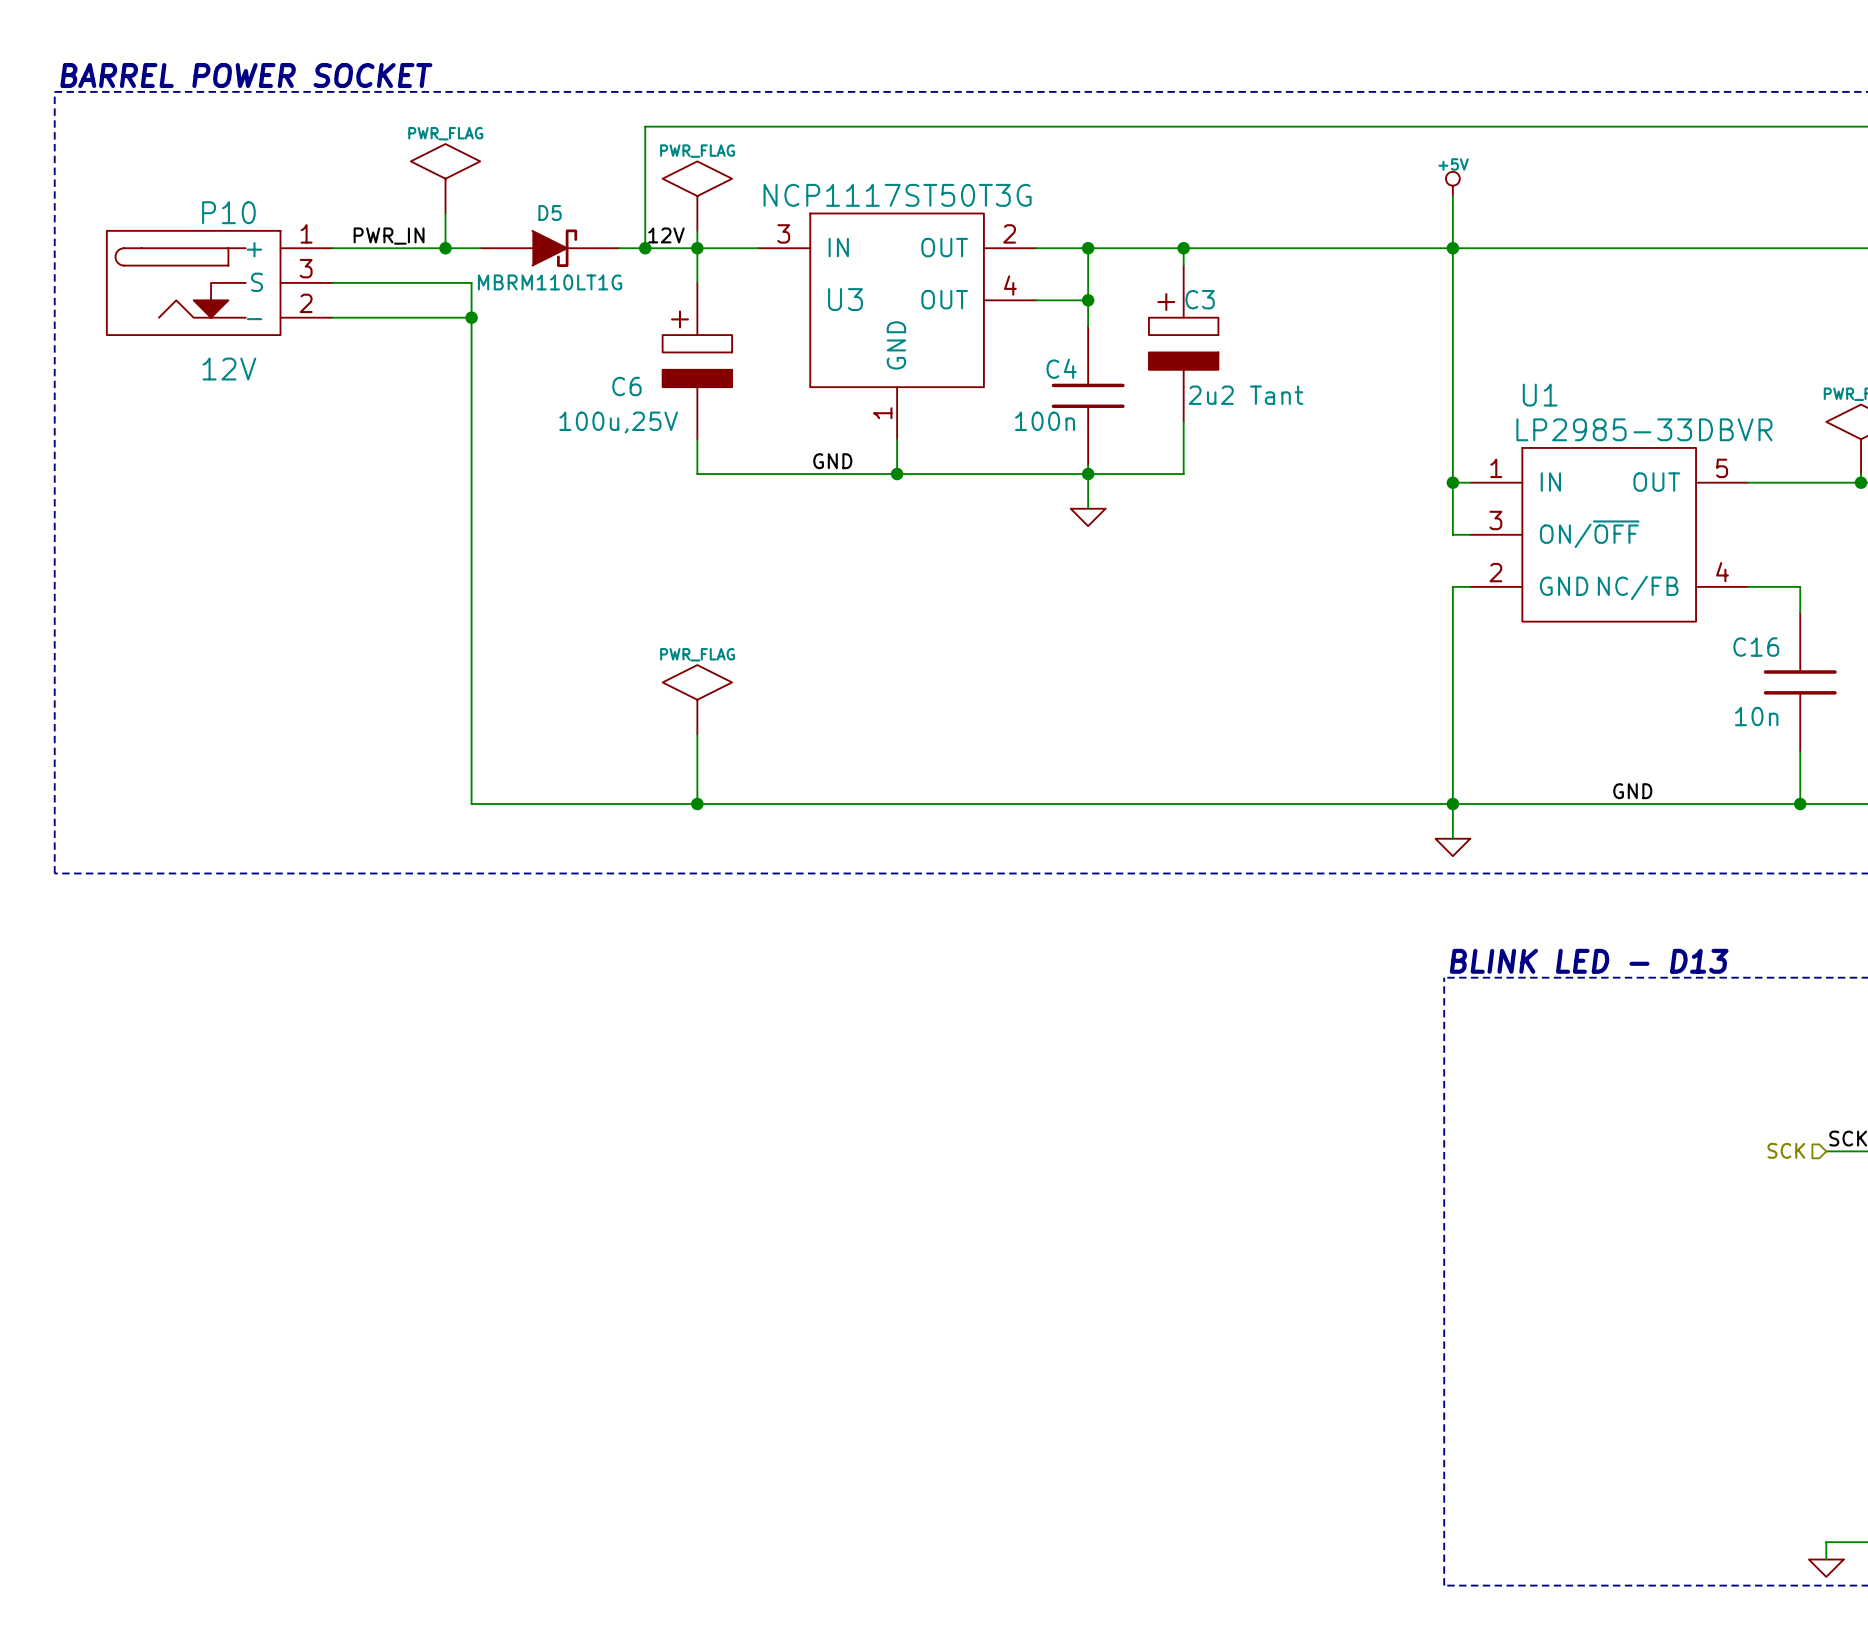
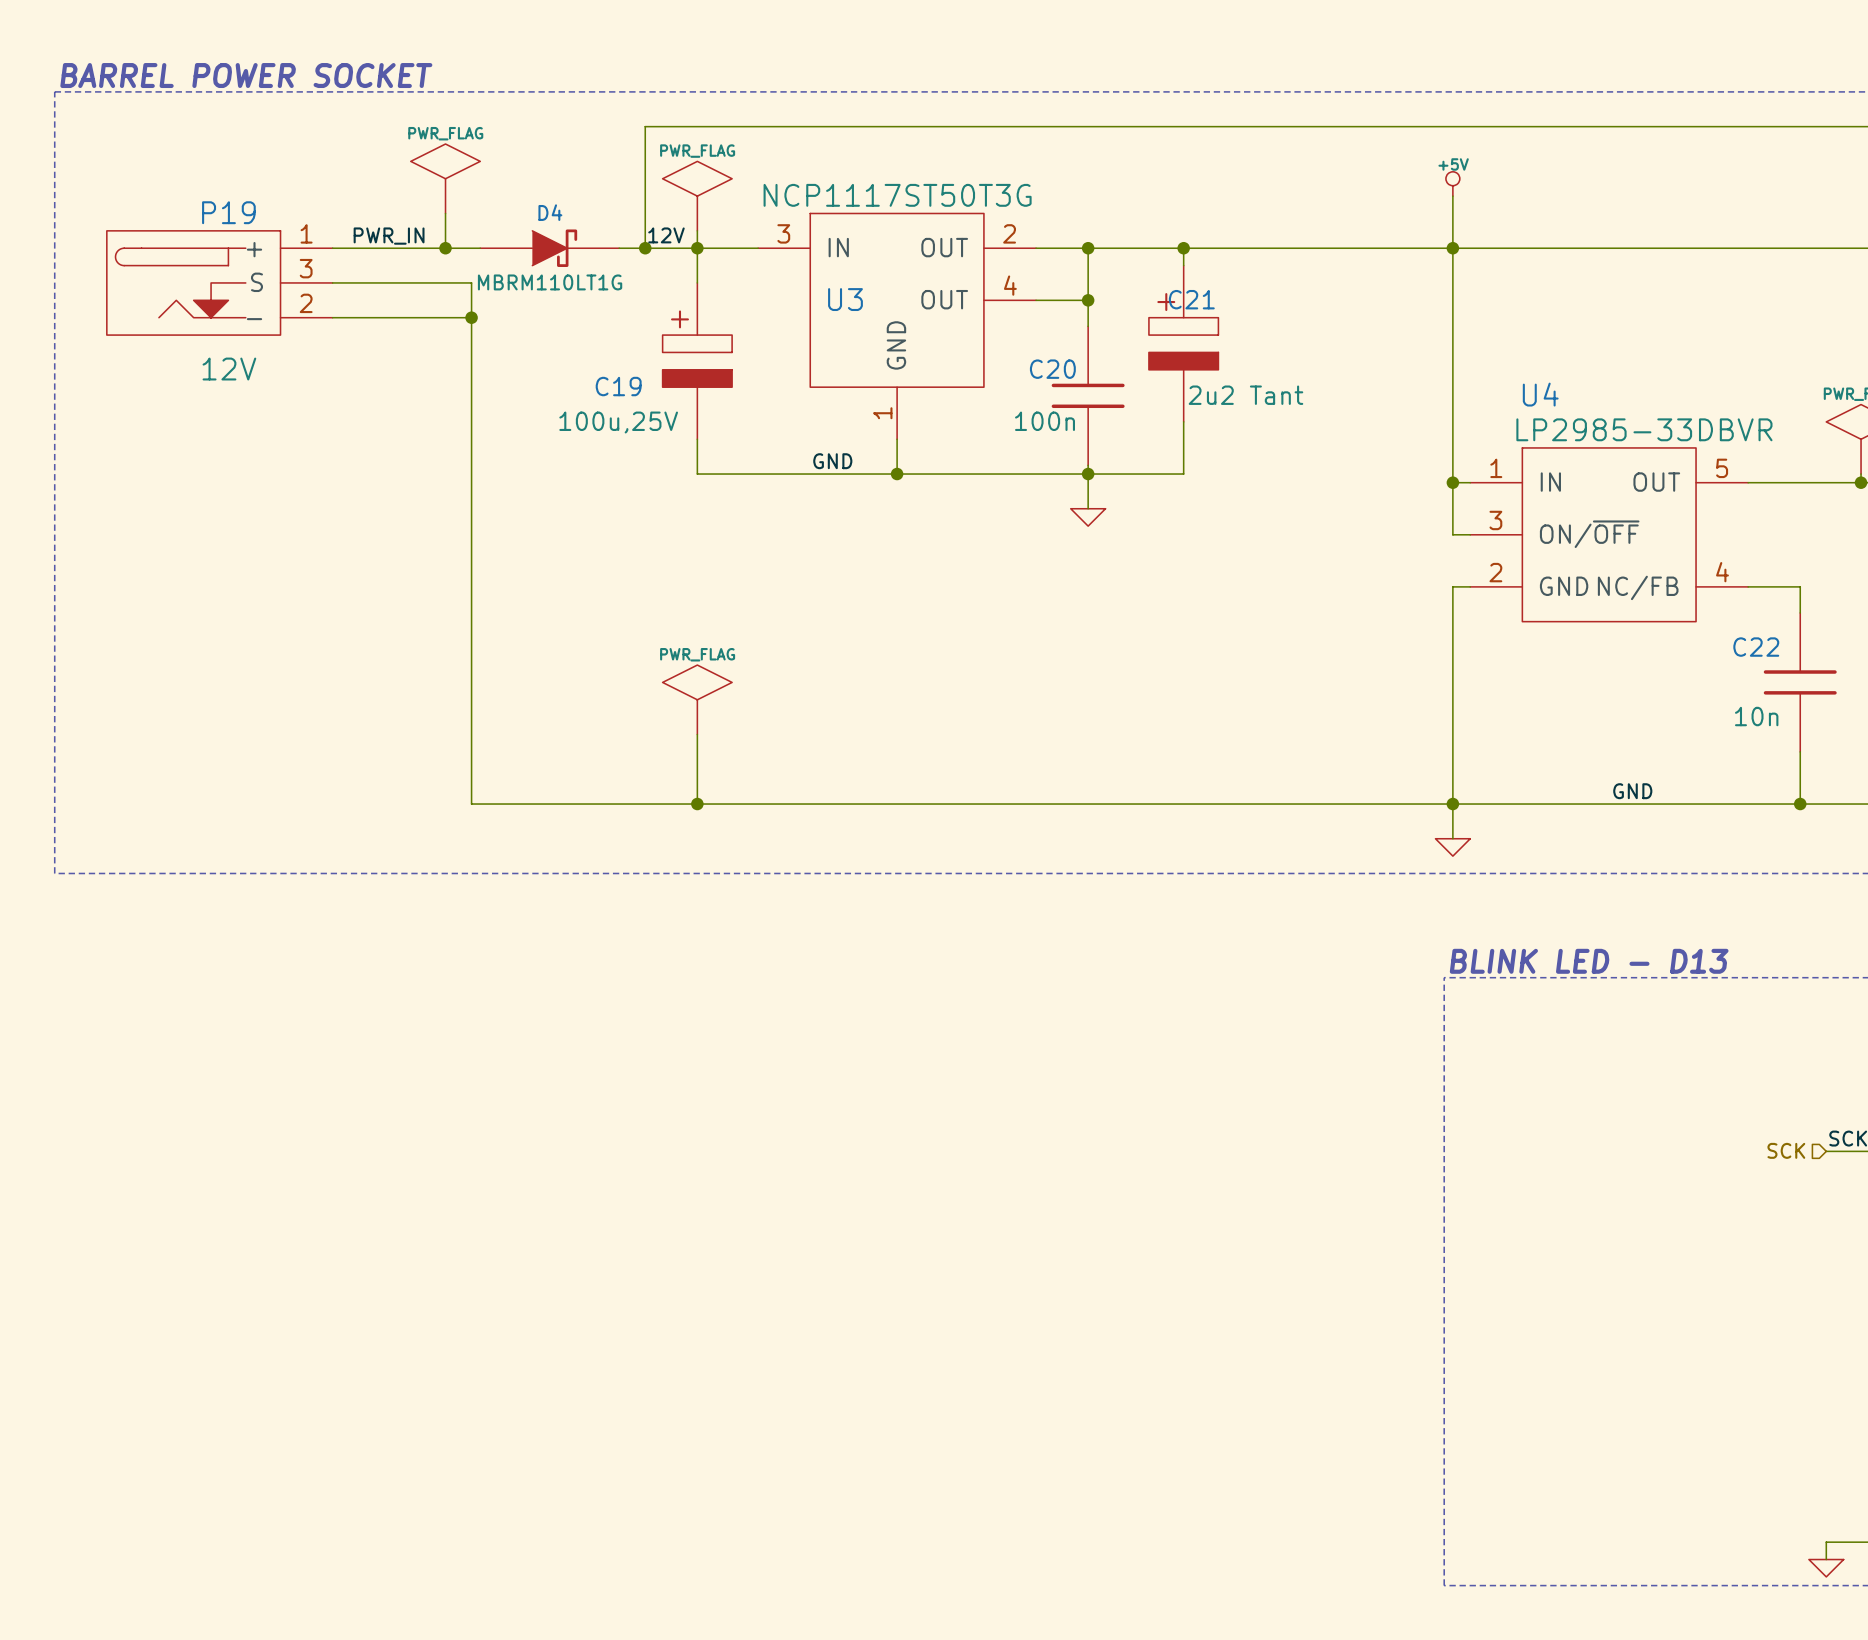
P10 name: P10 (228, 212) -> P19 (228, 212)
D5 name: D5 (550, 212) -> D4 (550, 212)
C3 name: C3 (1200, 299) -> C21 (1191, 299)
C4 name: C4 (1061, 368) -> C20 (1052, 369)
C6 name: C6 (626, 386) -> C19 (618, 386)
U1 name: U1 (1540, 395) -> U4 (1540, 394)
C16 name: C16 (1756, 647) -> C22 (1756, 647)

